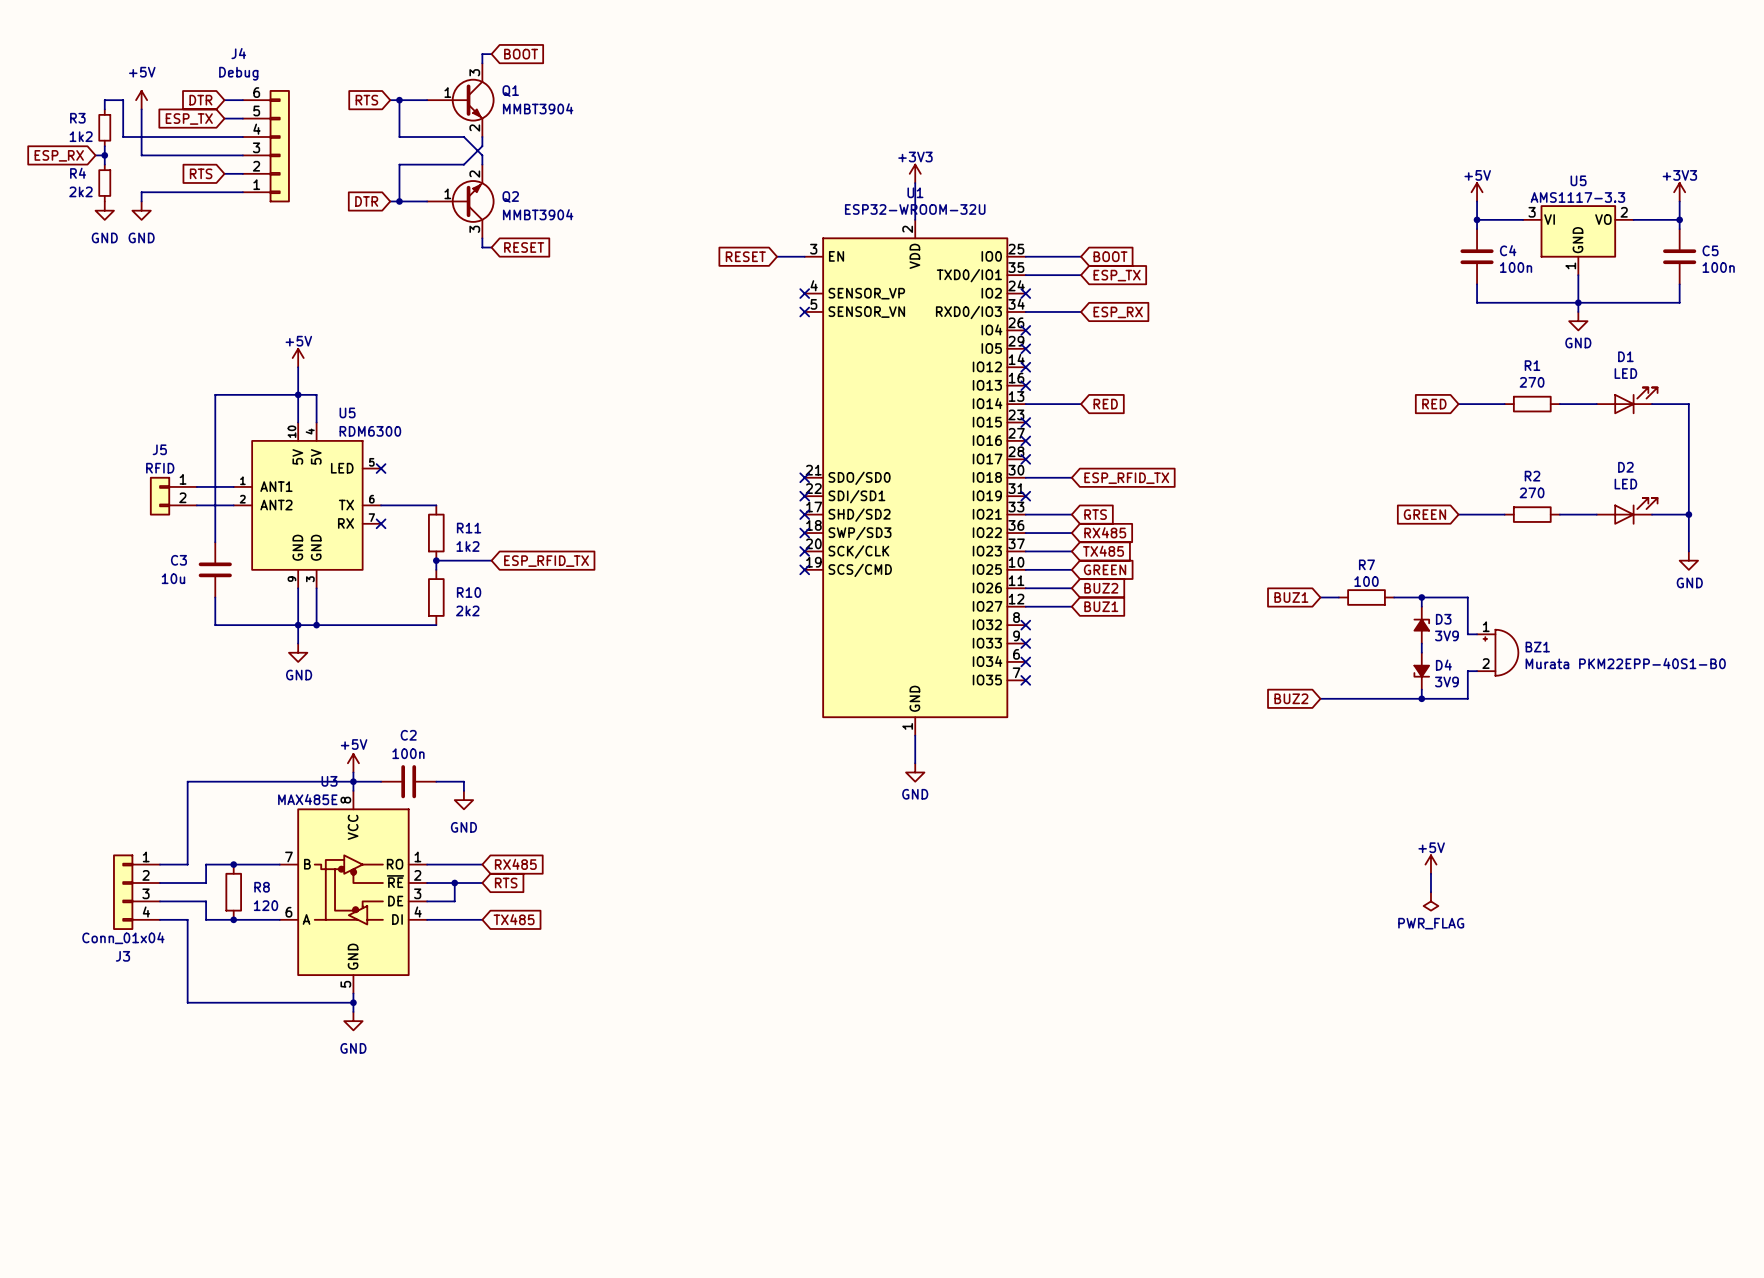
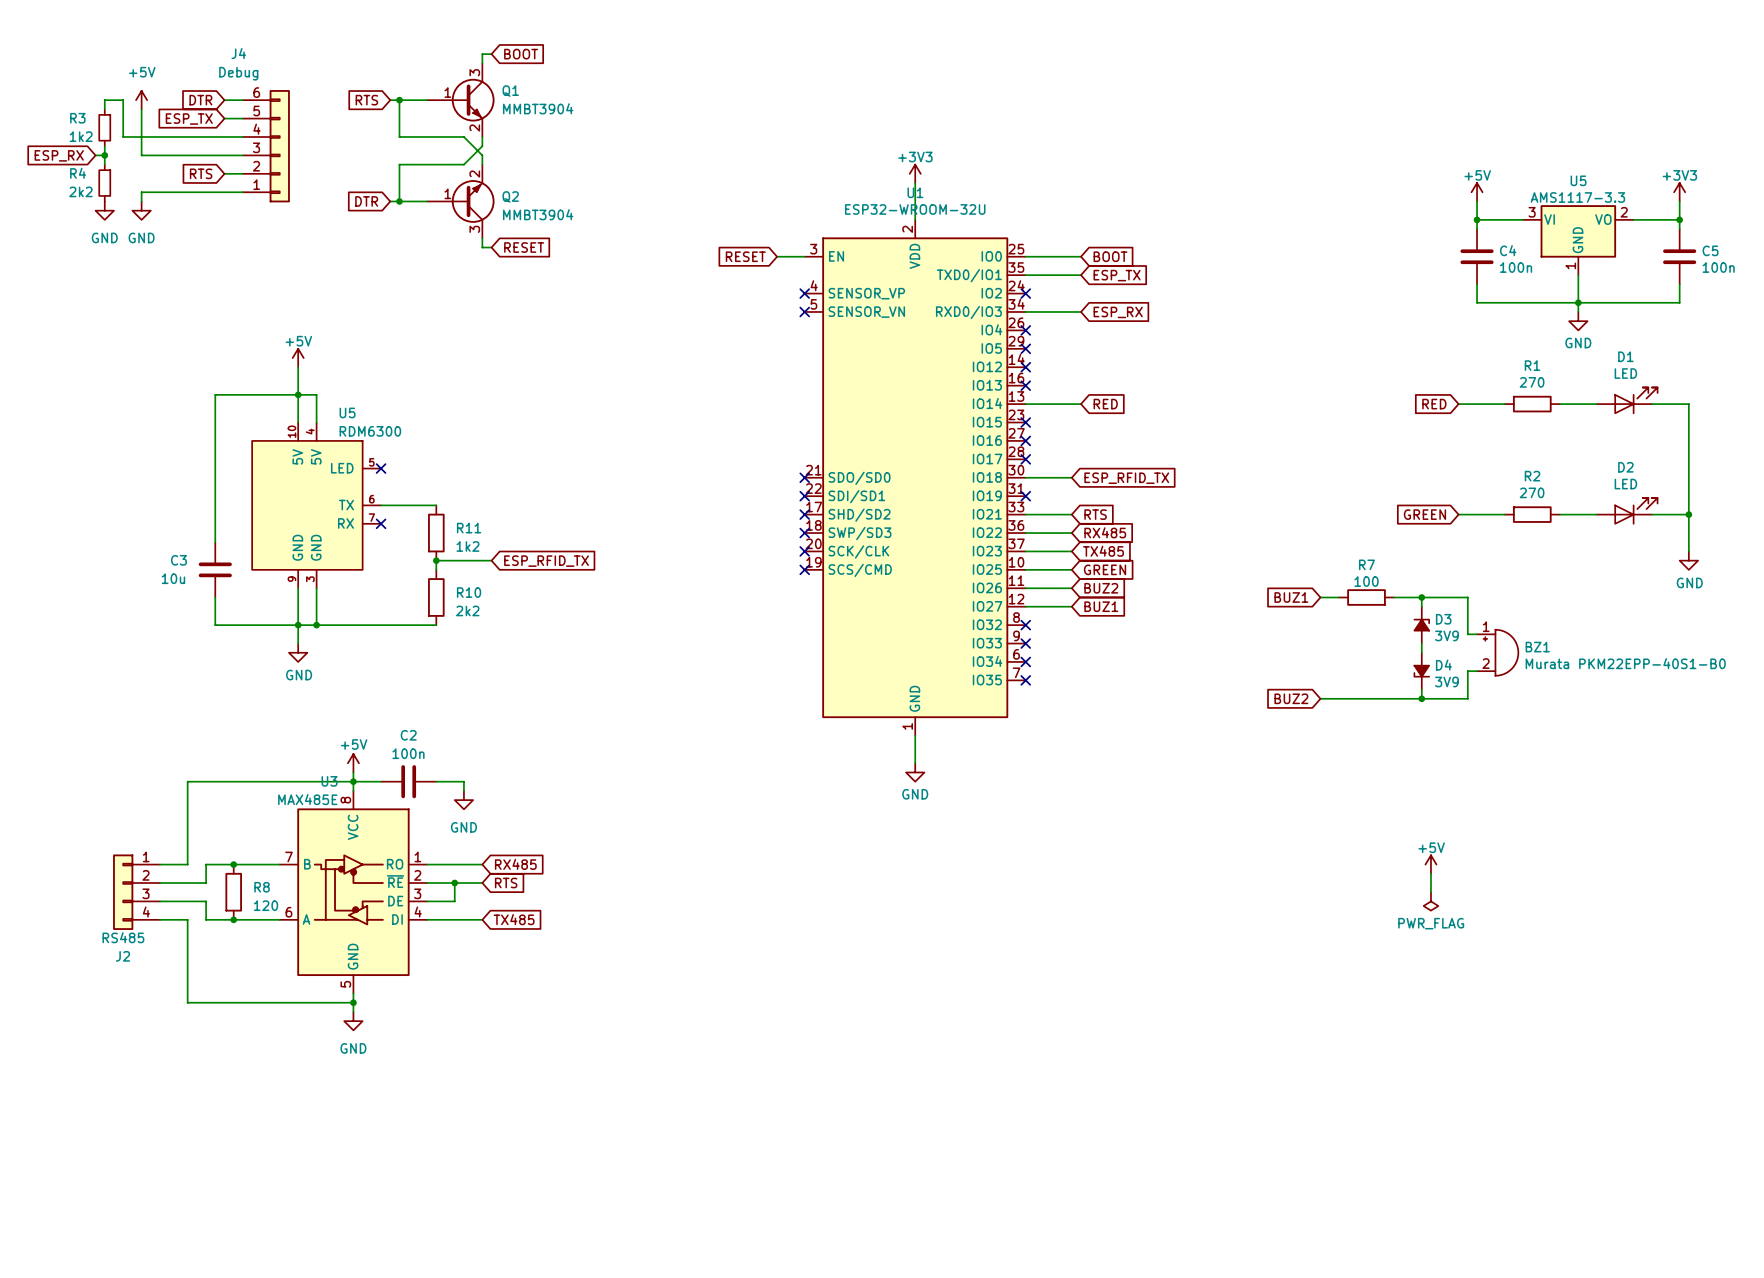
wire: (196, 486) (233, 486) -> none
J5: RFID (173, 496) -> none
wire: (196, 505) (233, 505) -> none
U5: RDM6300 (307, 505) -> none
U5: none -> RDM6300 (316, 505)
J3 value: Conn_01x04 (123, 938) -> RS485 (123, 937)
J3 name: J3 (122, 956) -> J2 (122, 956)

